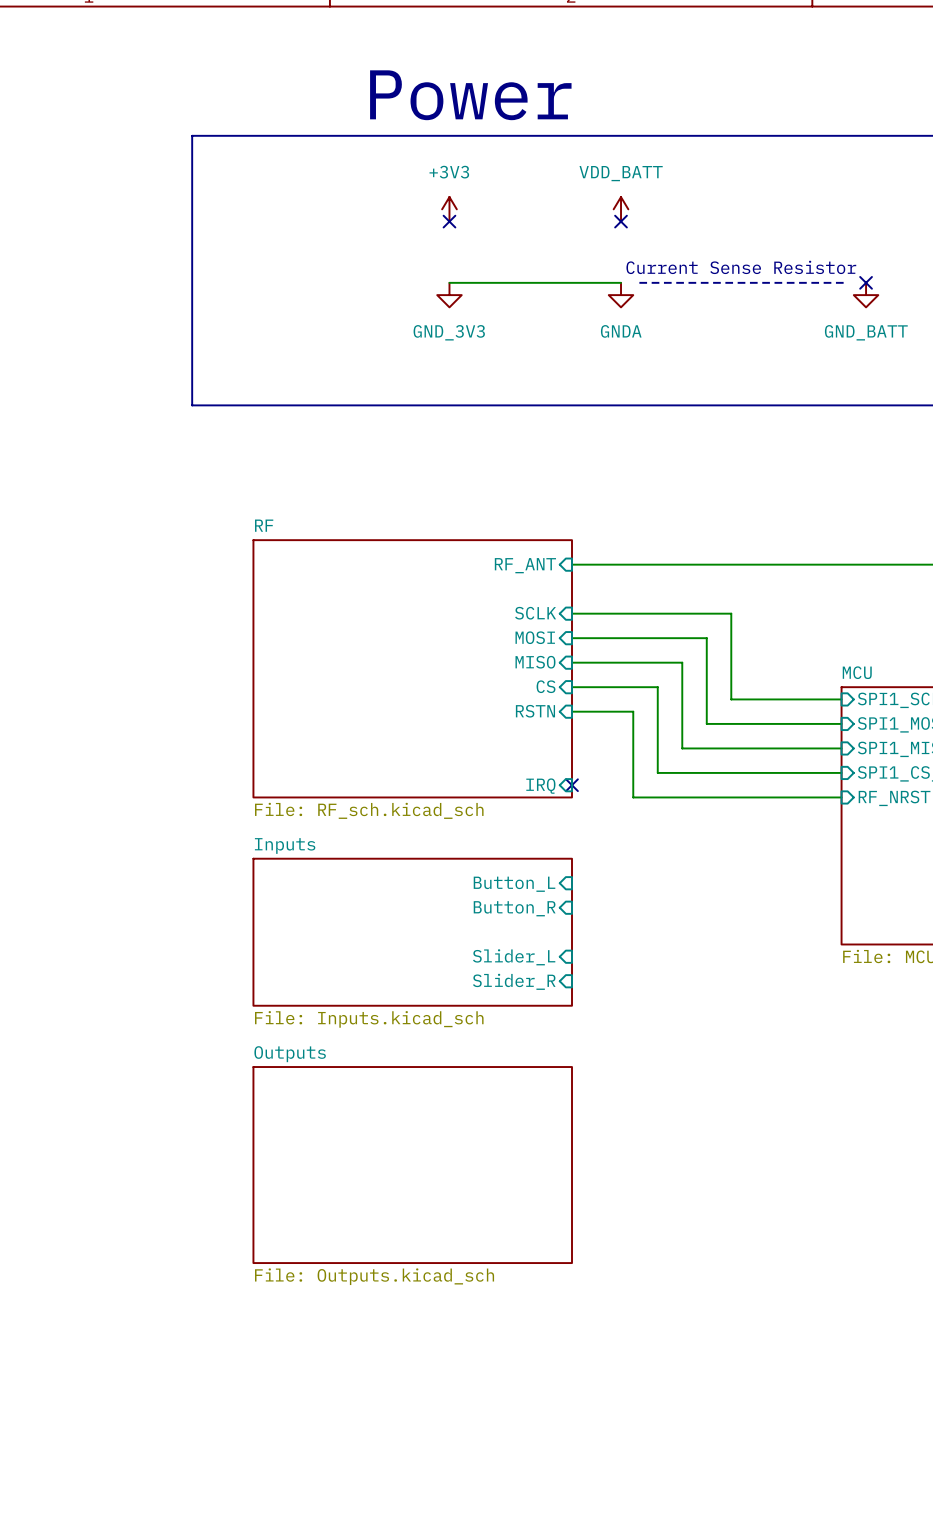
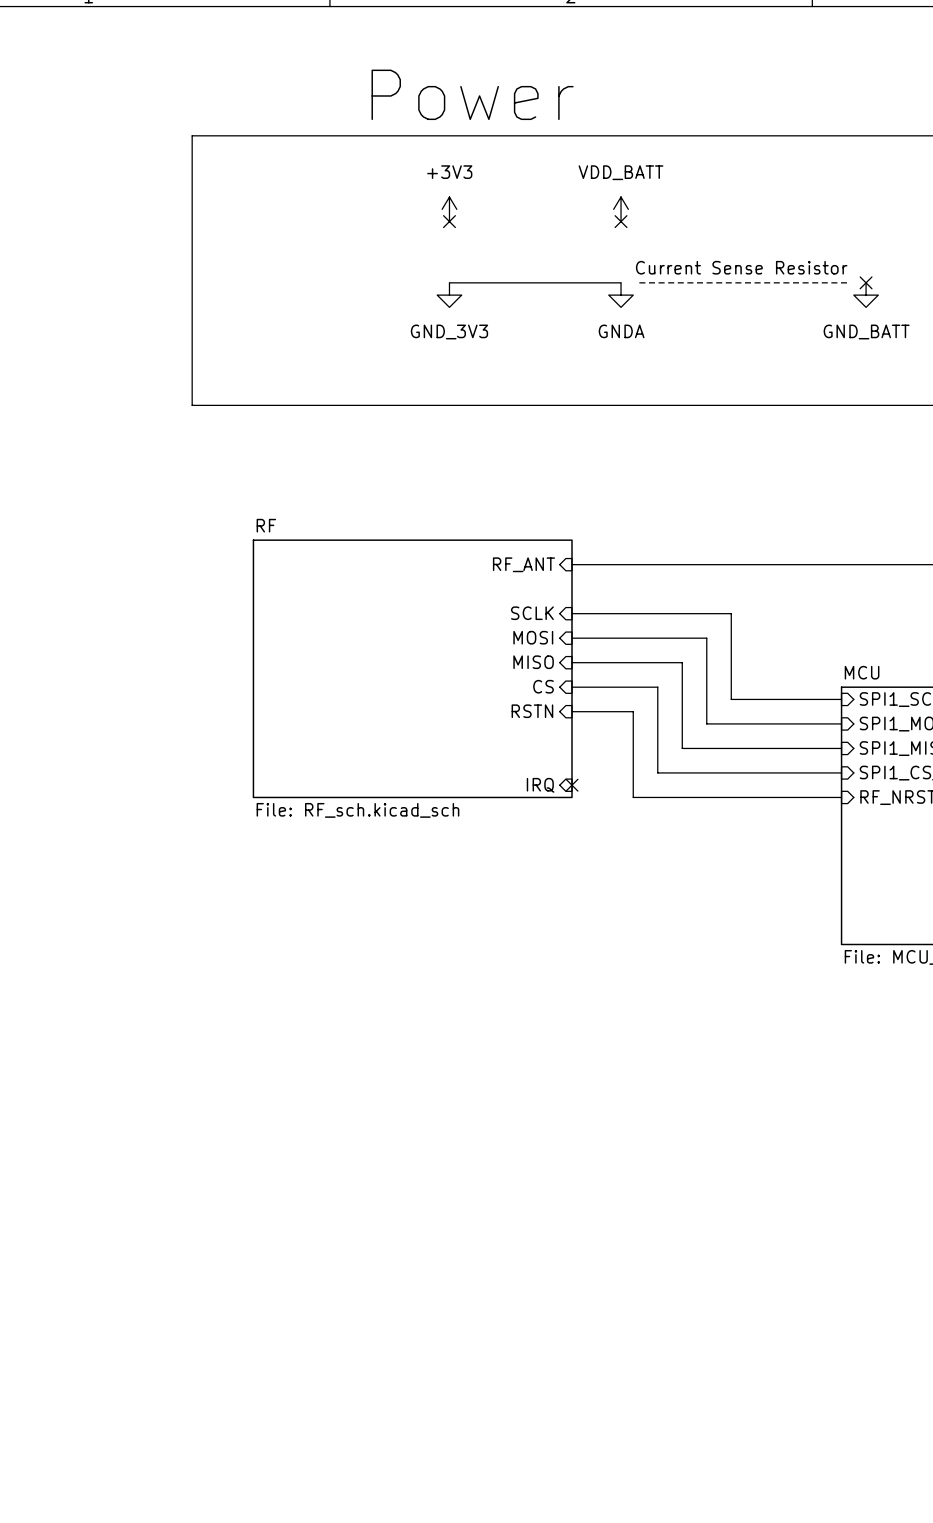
sheet pin: Button_L (514, 884) -> none
sheet pin: Button_R (514, 908) -> none
sheet Inputs: File: Inputs.kicad_sch (412, 932) -> none
sheet pin: Slider_L (514, 957) -> none
sheet pin: Slider_R (514, 981) -> none
sheet Outputs: File: Outputs.kicad_sch (412, 1165) -> none

